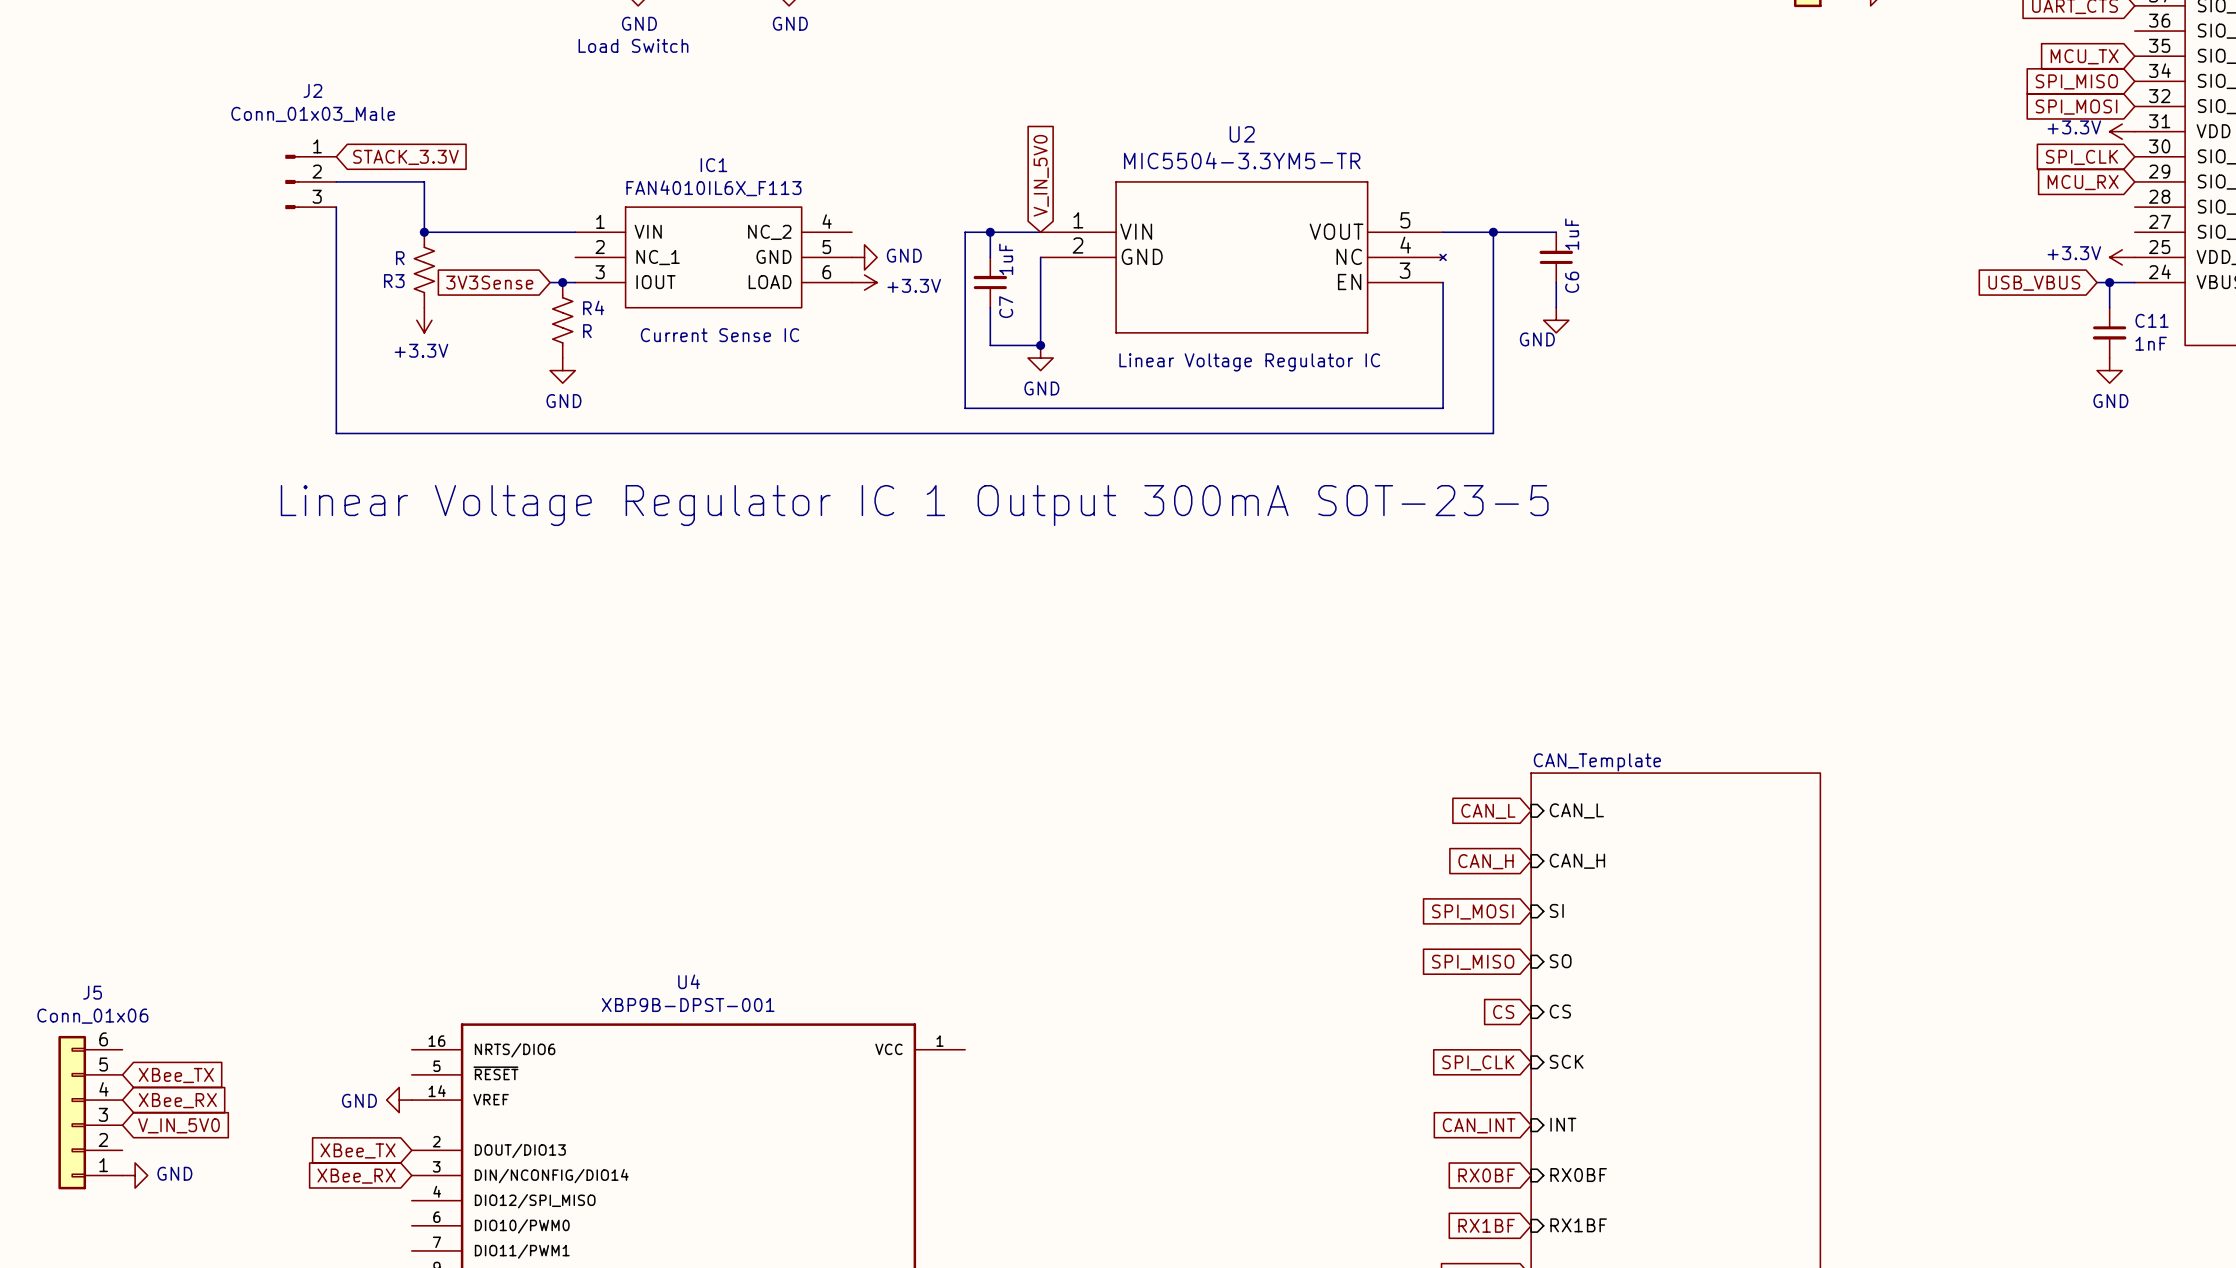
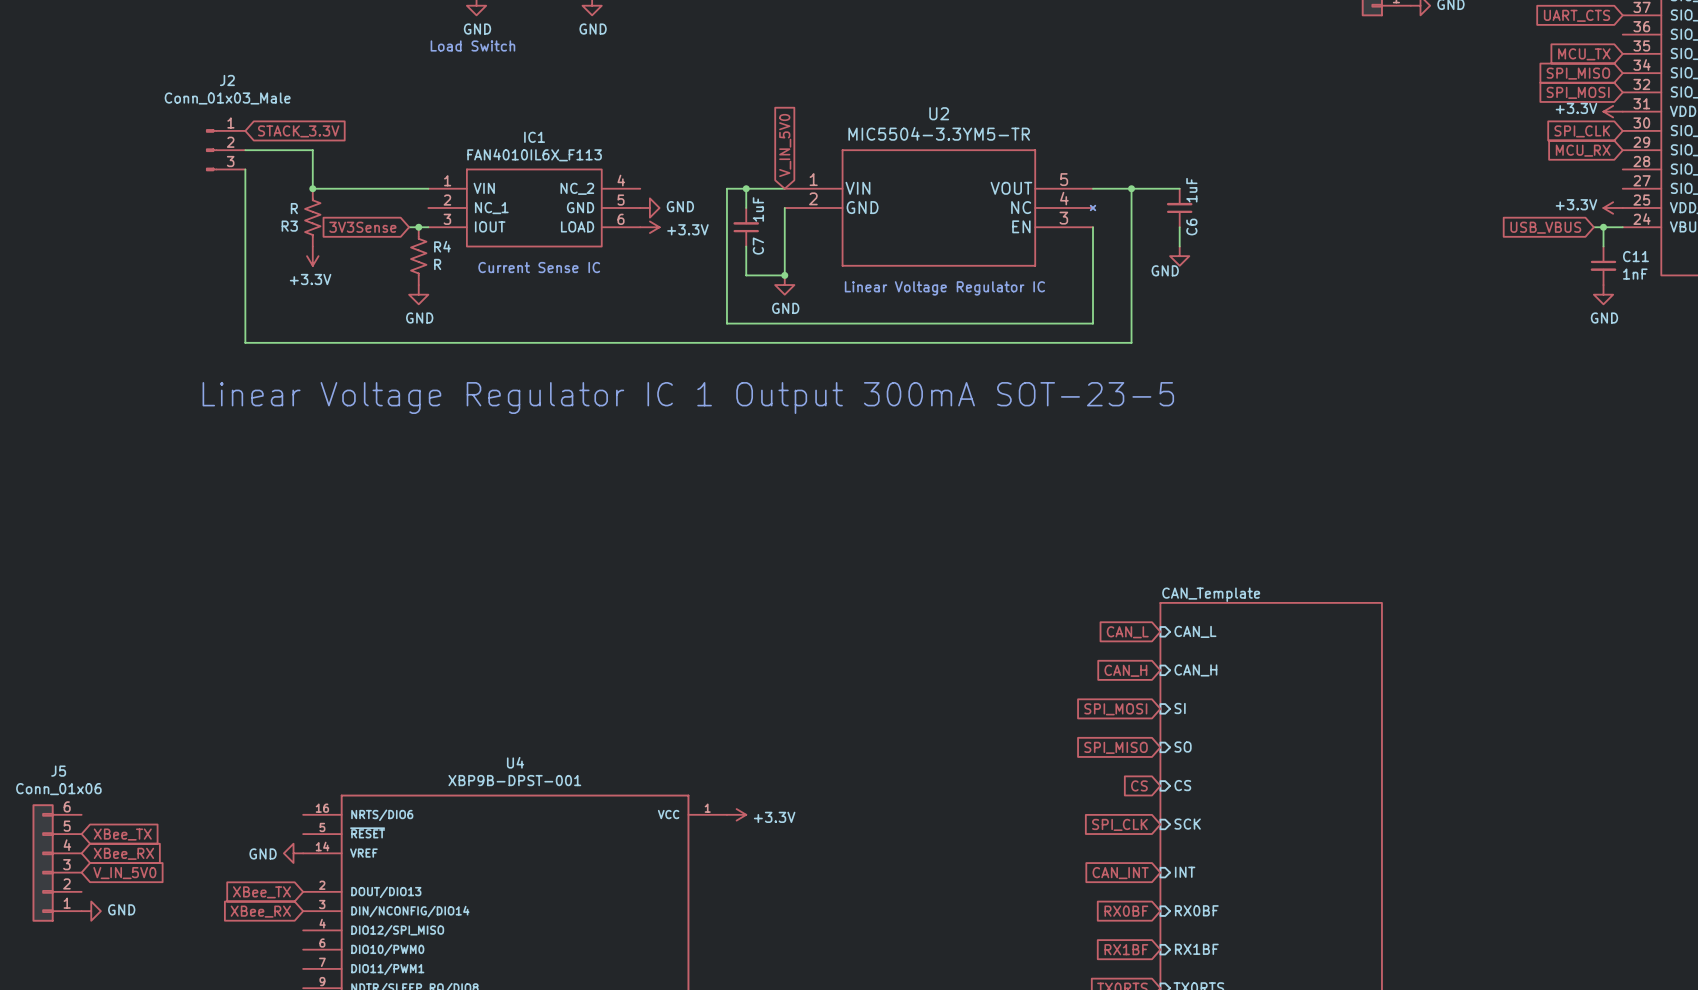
power symbol: none -> +3.3V (736, 814)

